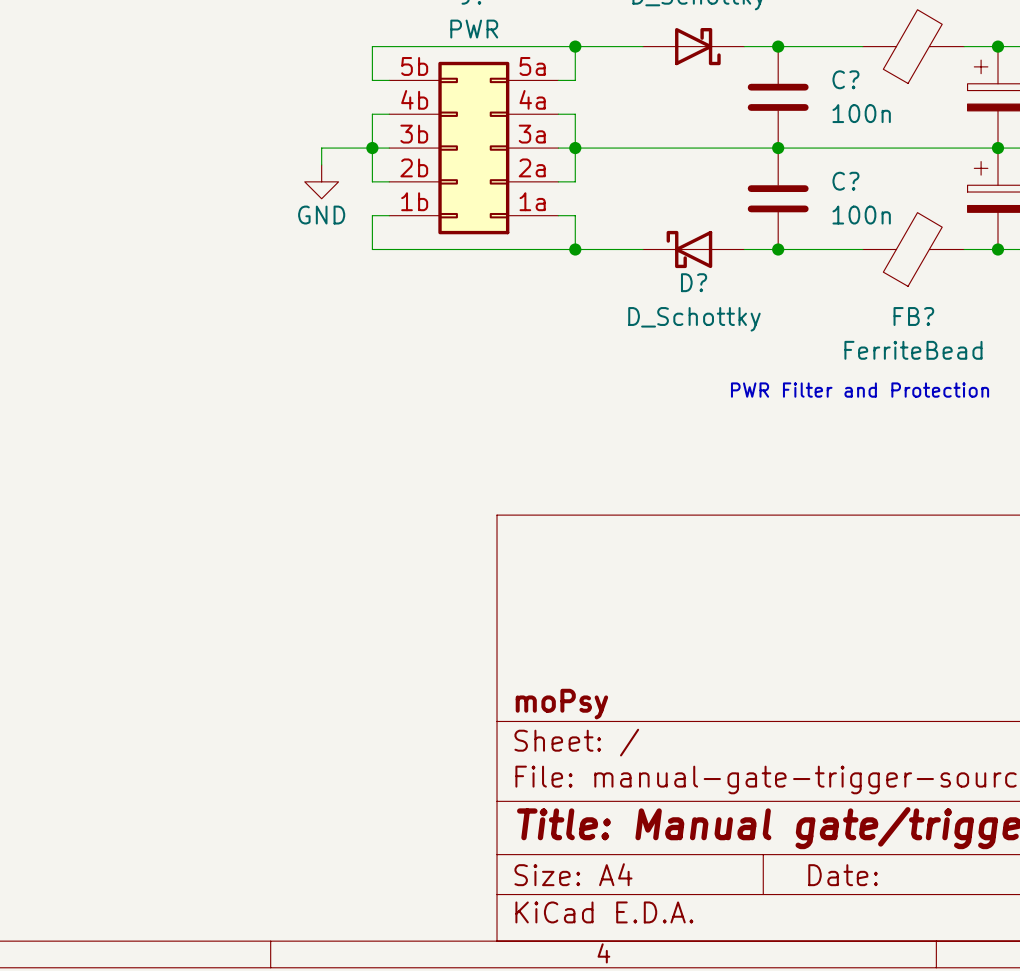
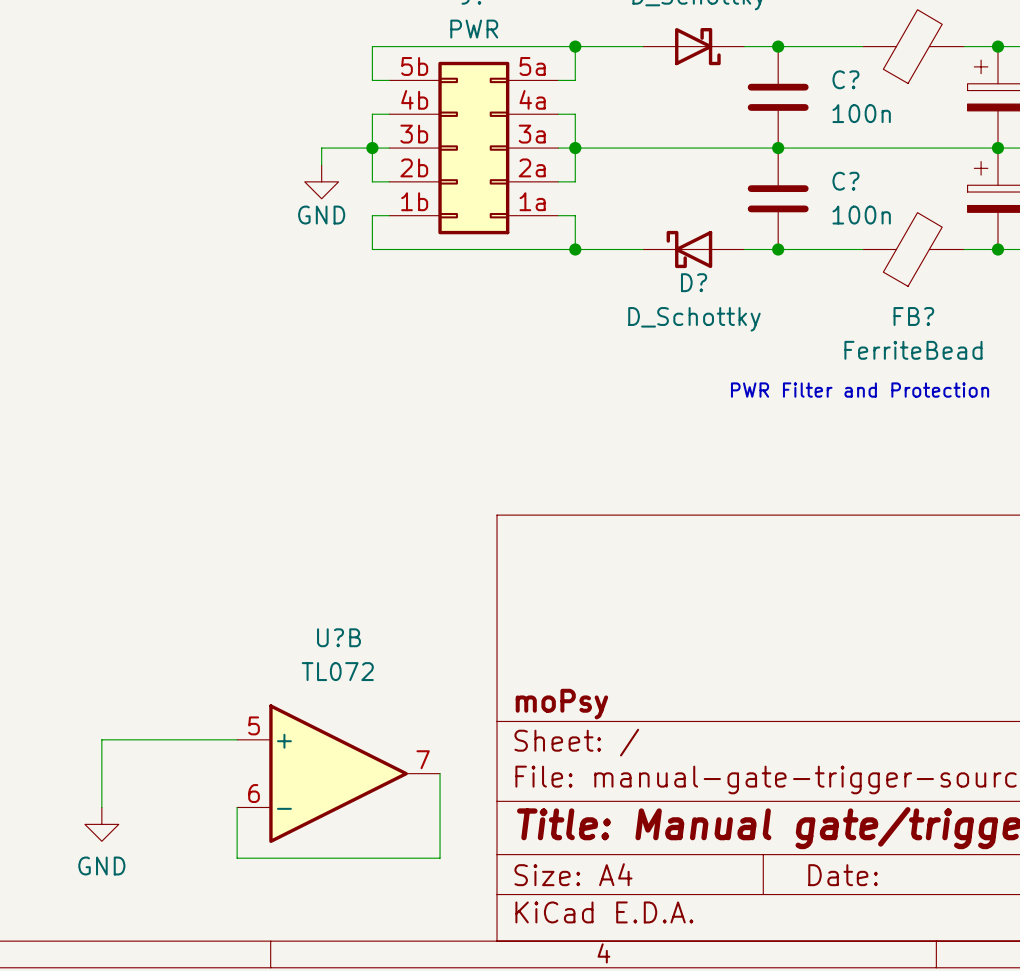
wire: none -> (237, 739) (101, 739) (101, 807)
U?B: none -> TL072 (338, 773)
wire: none -> (440, 773) (440, 858) (237, 858) (237, 807)
power symbol: none -> GND (101, 824)

